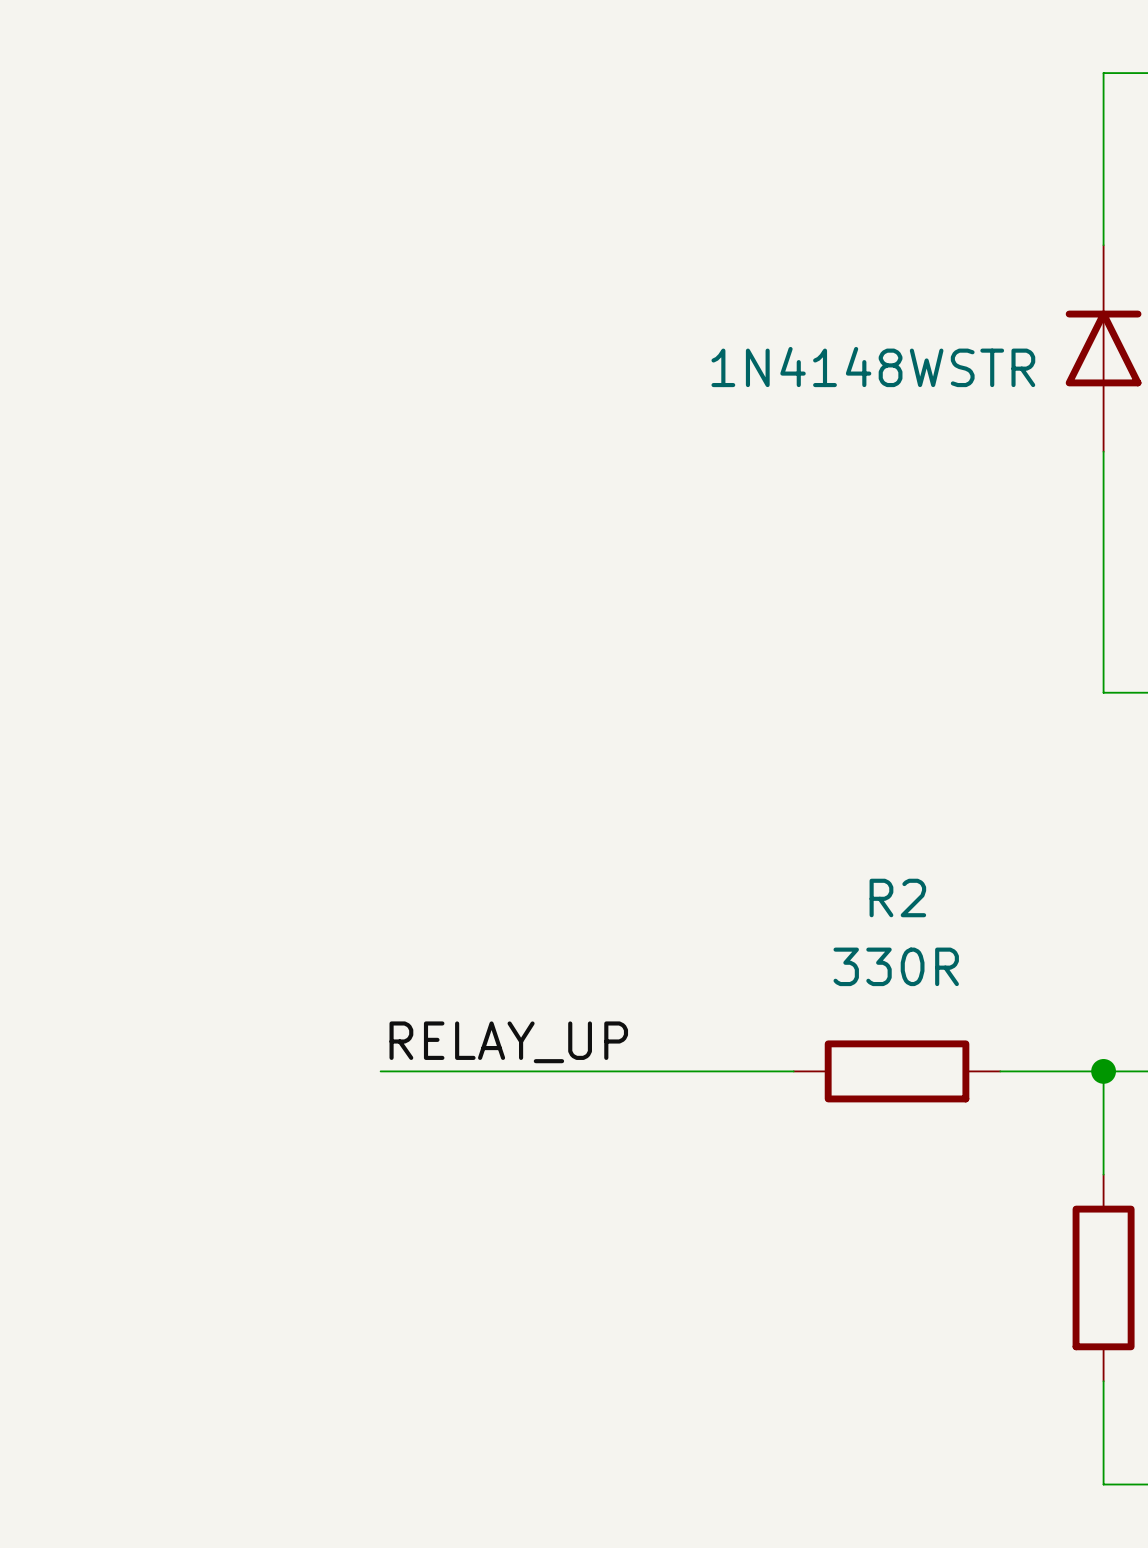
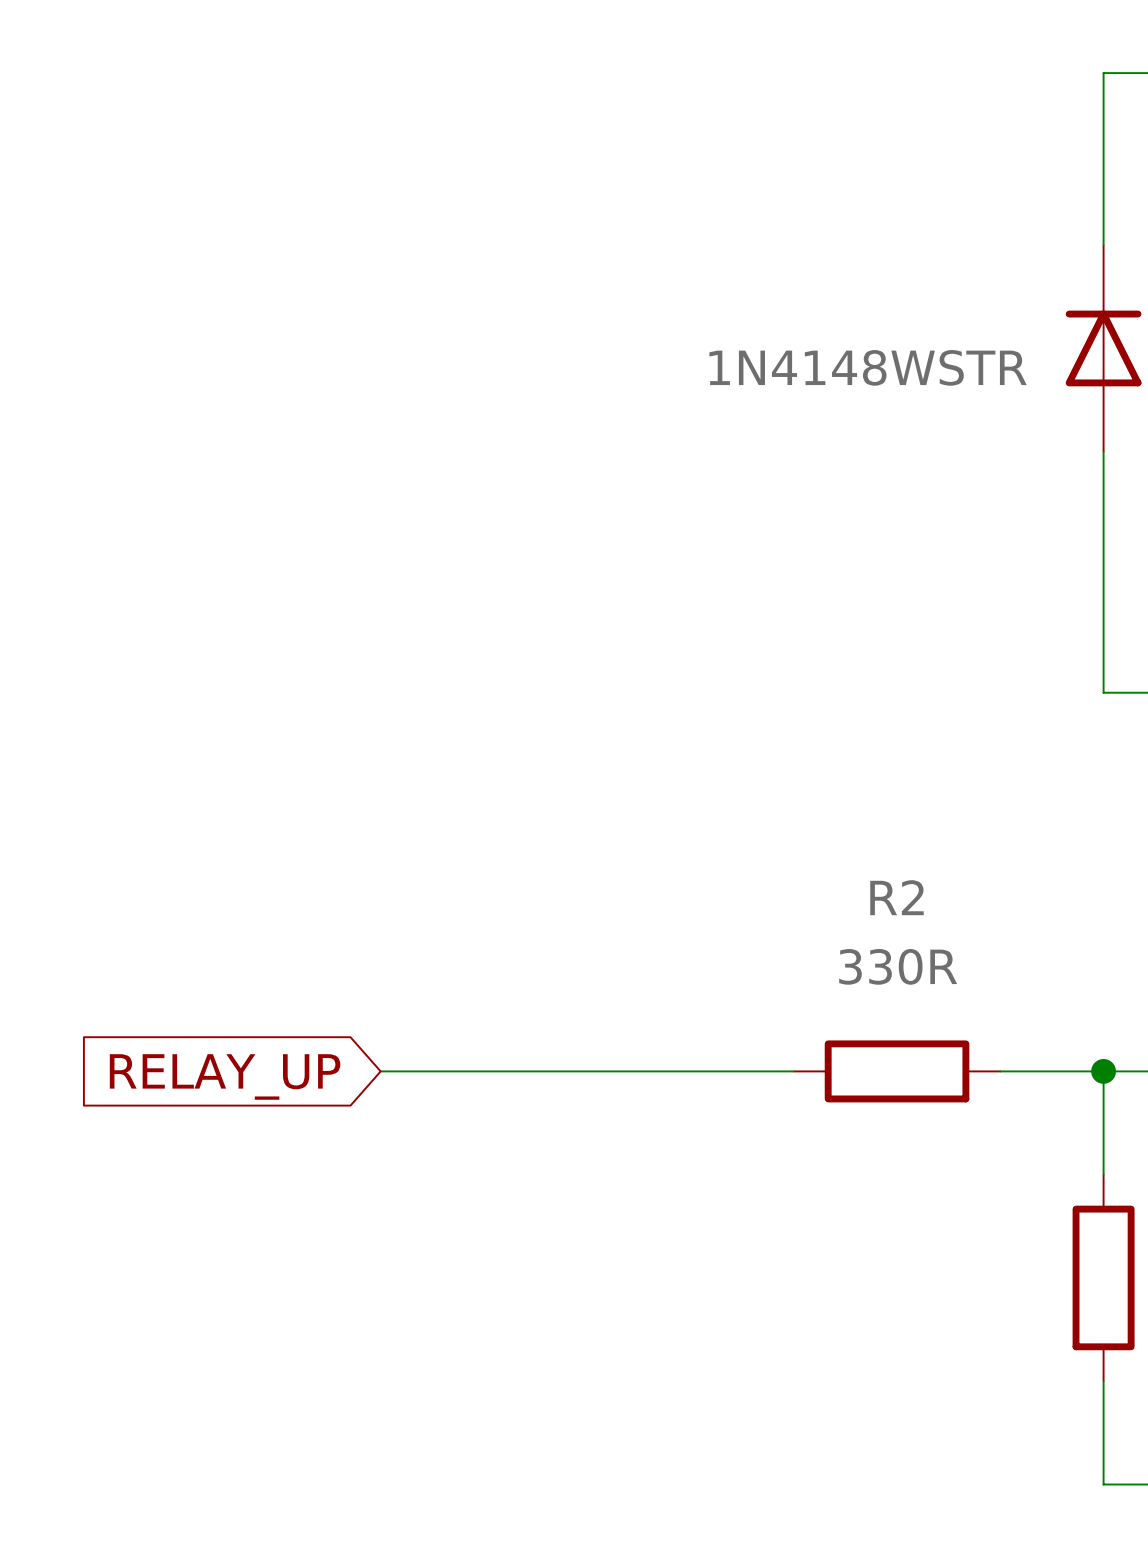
label: RELAY_UP (508, 1042) -> none
global label: none -> RELAY_UP (225, 1076)

